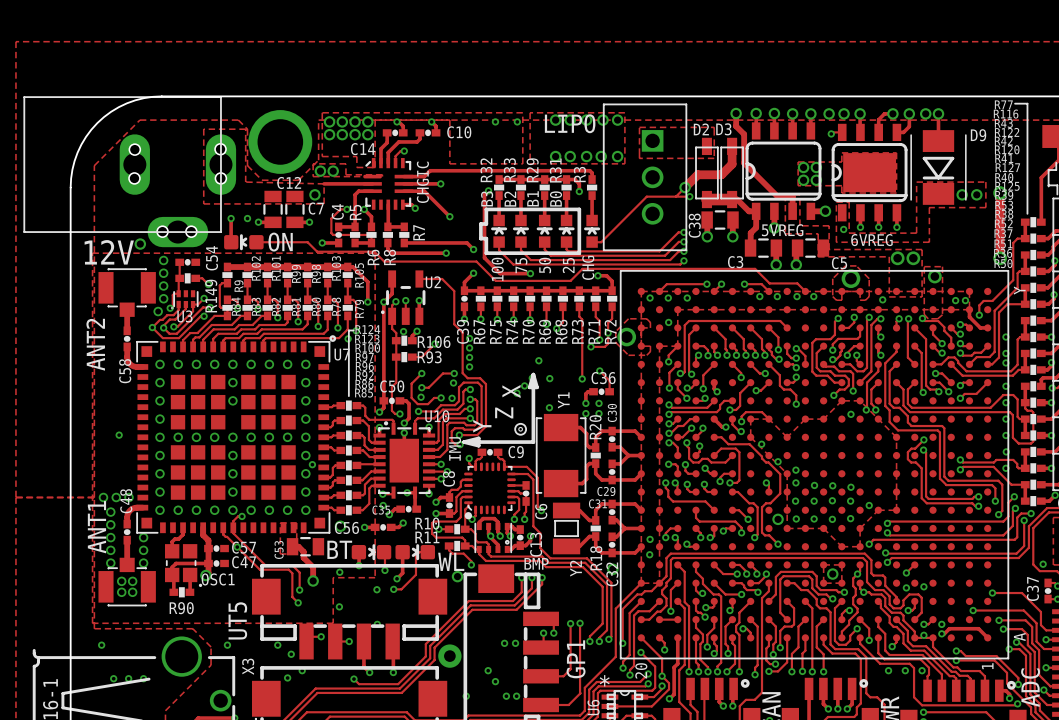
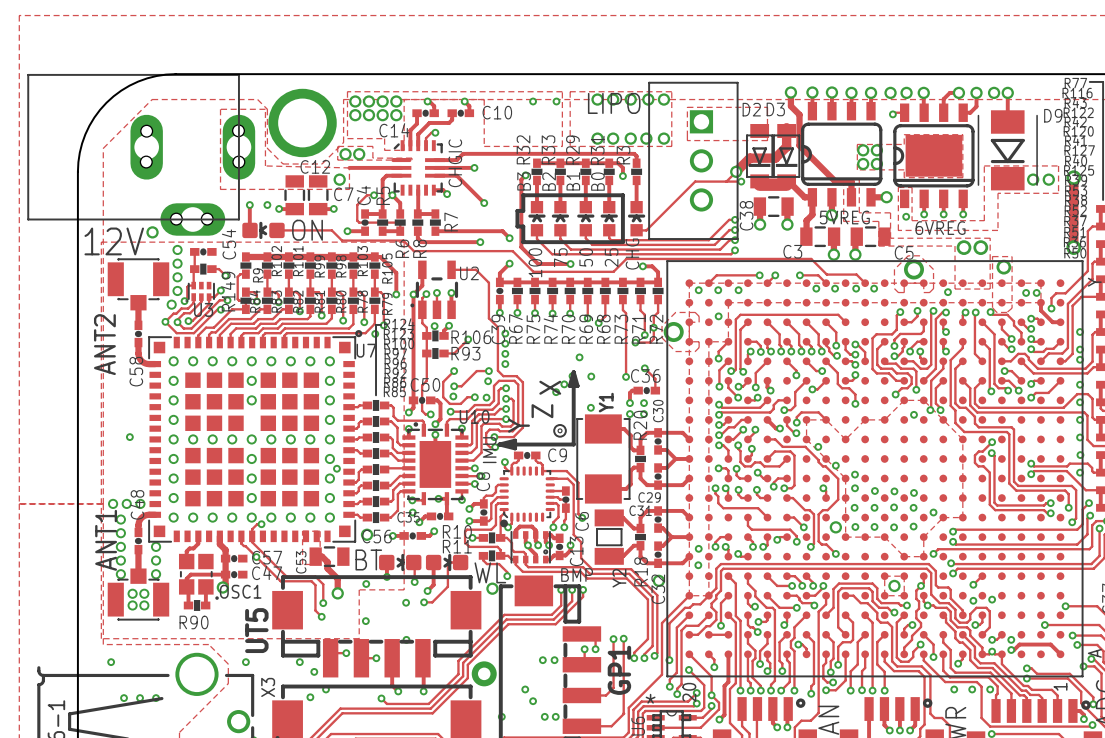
D2 footprint: [695, 137, 719, 209] -> [746, 124, 774, 189]
D3 footprint: [720, 137, 744, 209] -> [772, 124, 801, 189]

